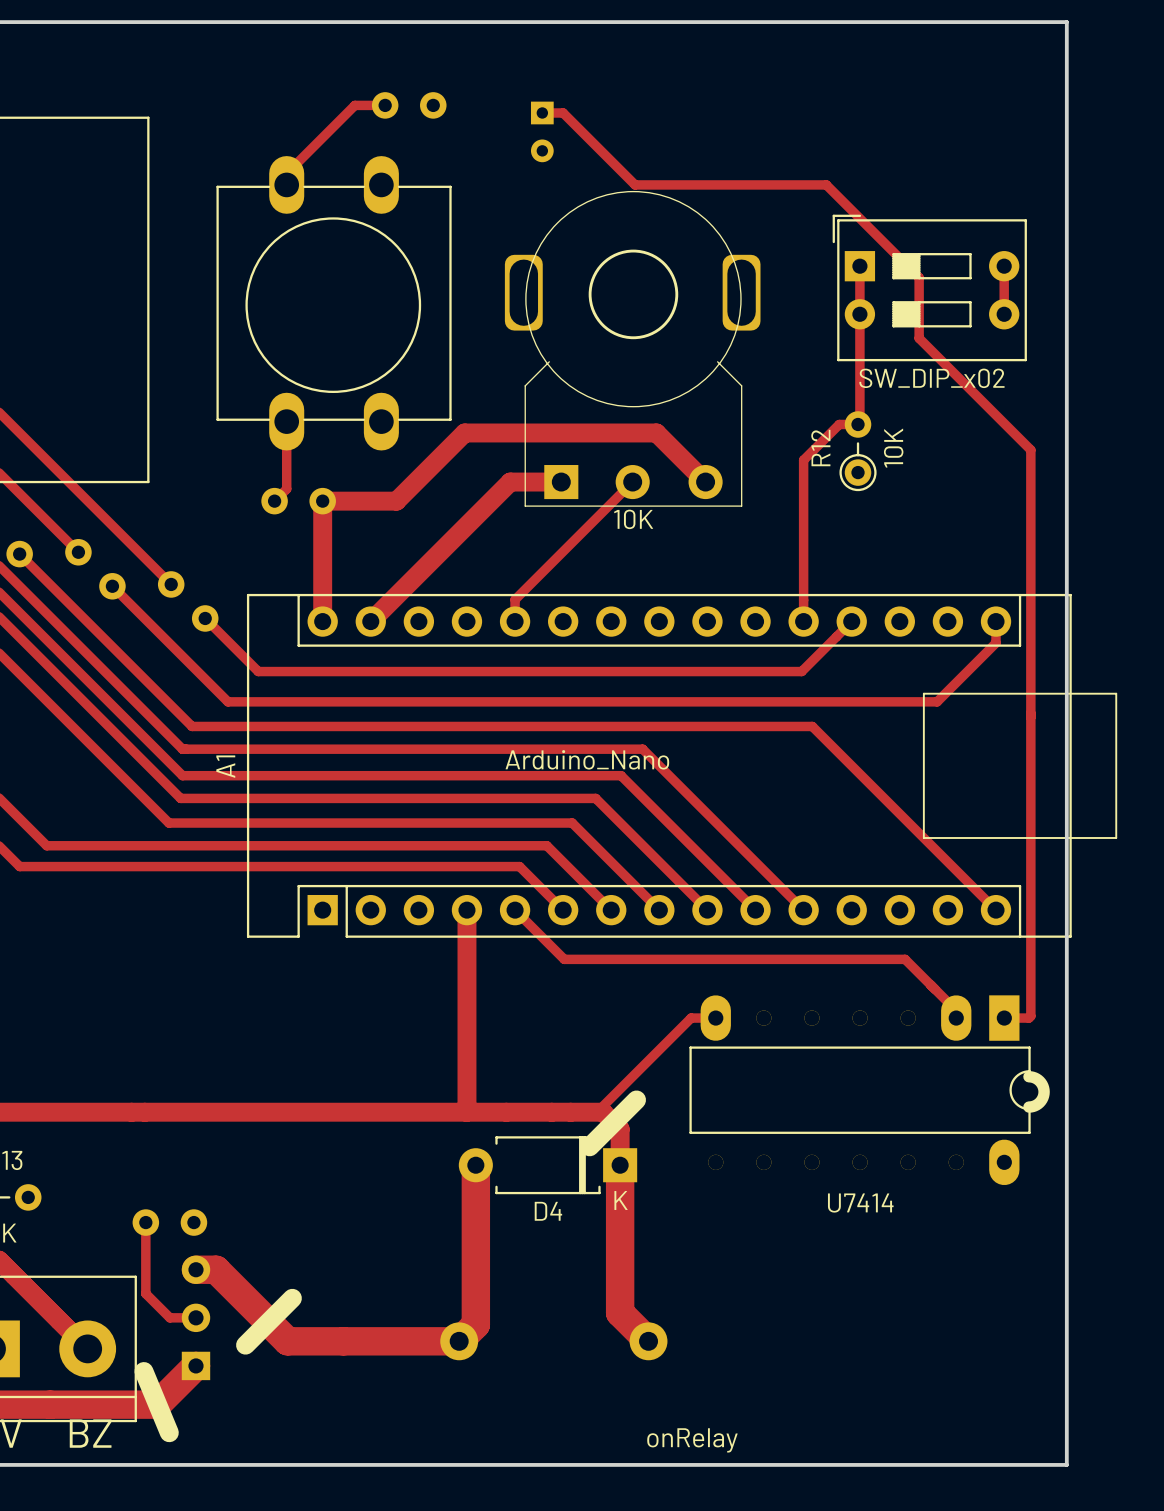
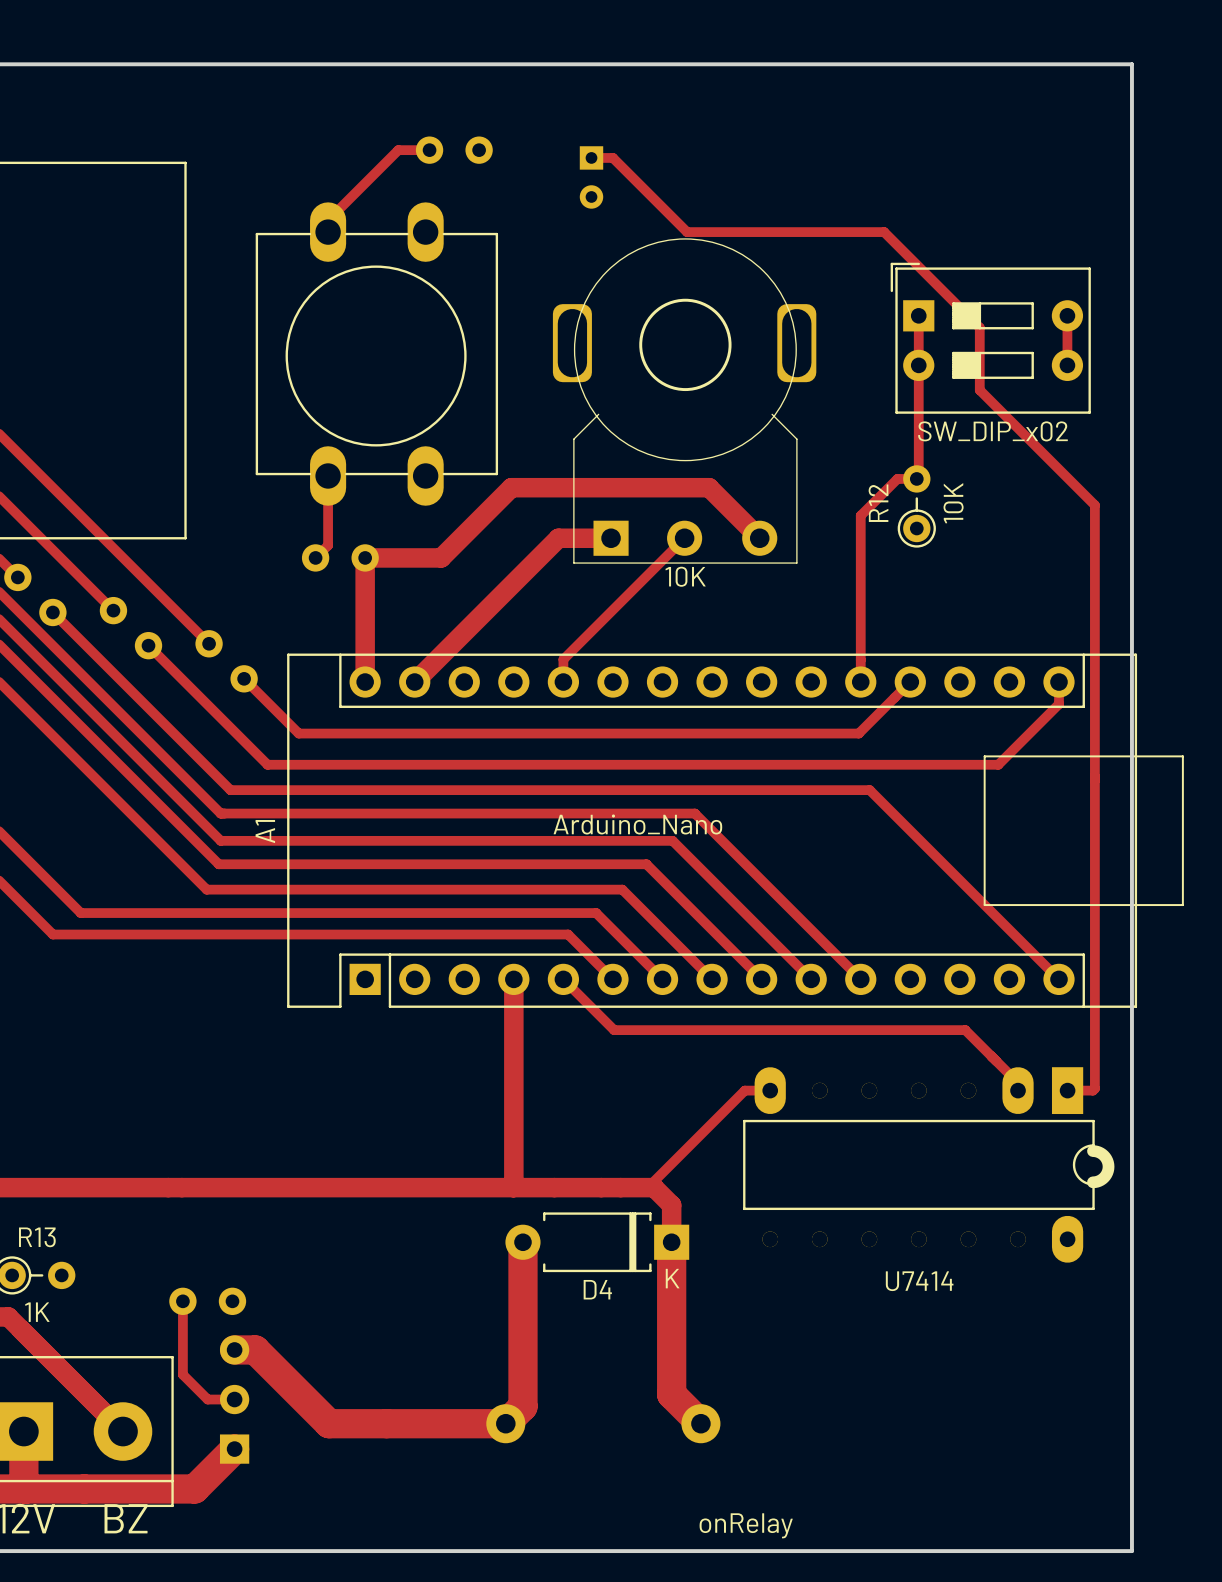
line: (636, 1099) (589, 1146) -> none
line: (292, 1298) (245, 1345) -> none
line: (143, 1371) (169, 1432) -> none

